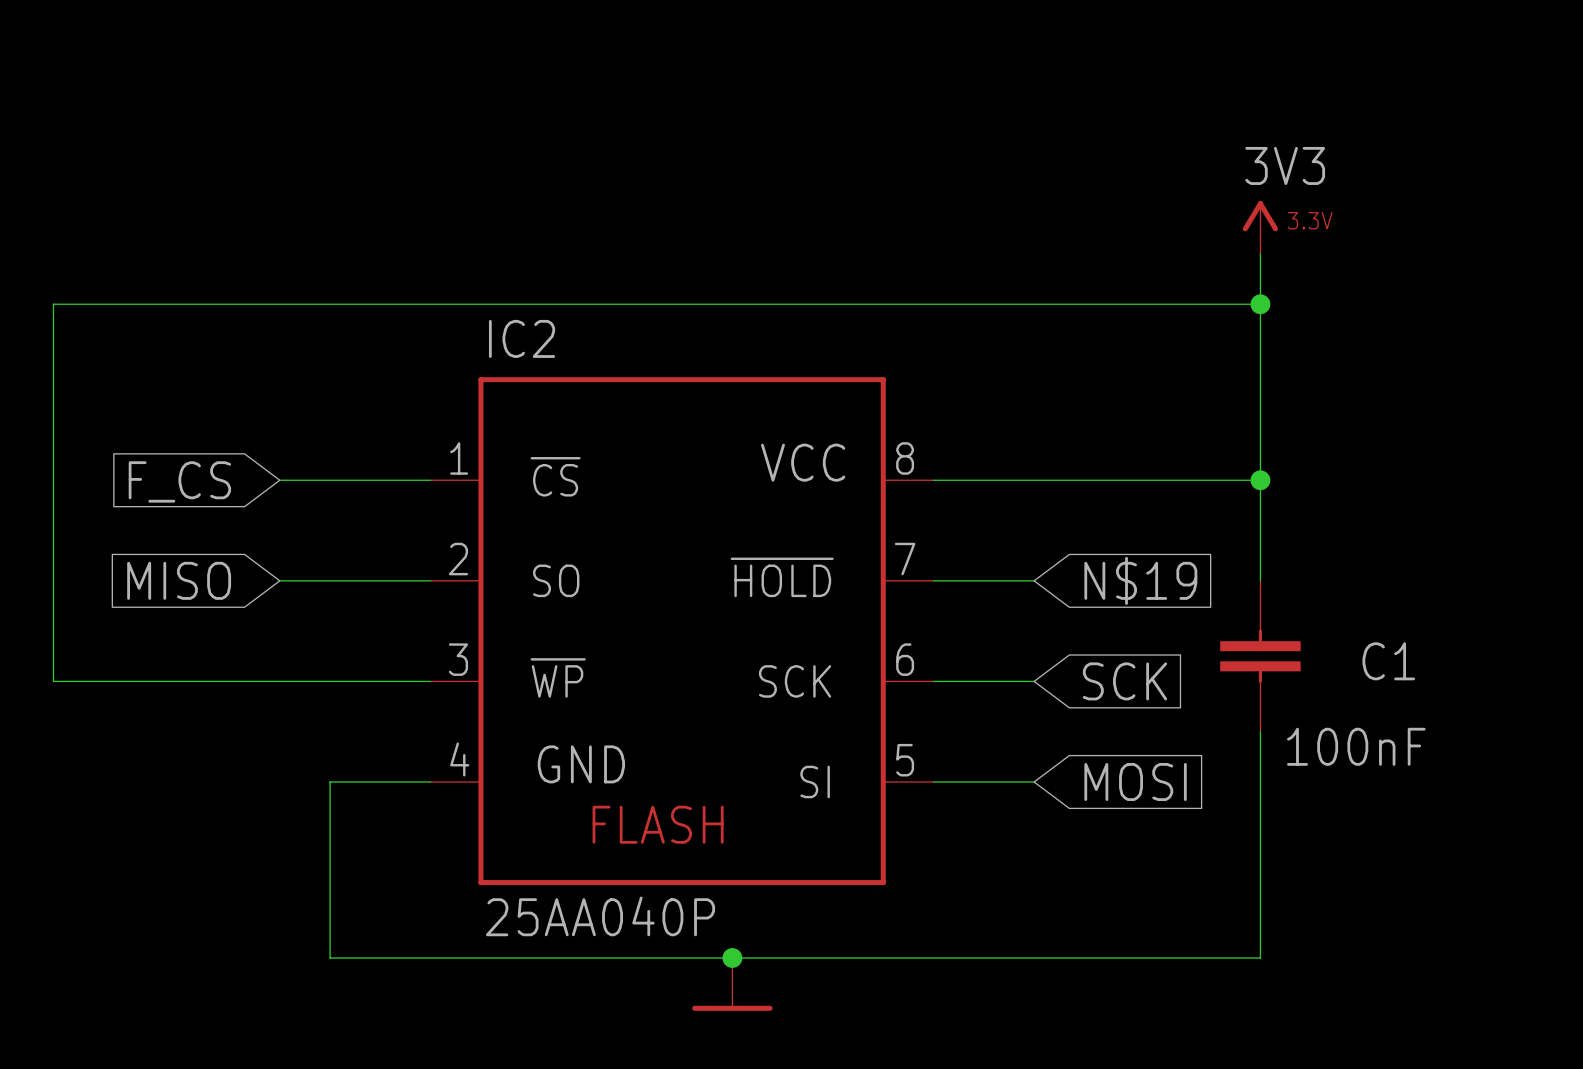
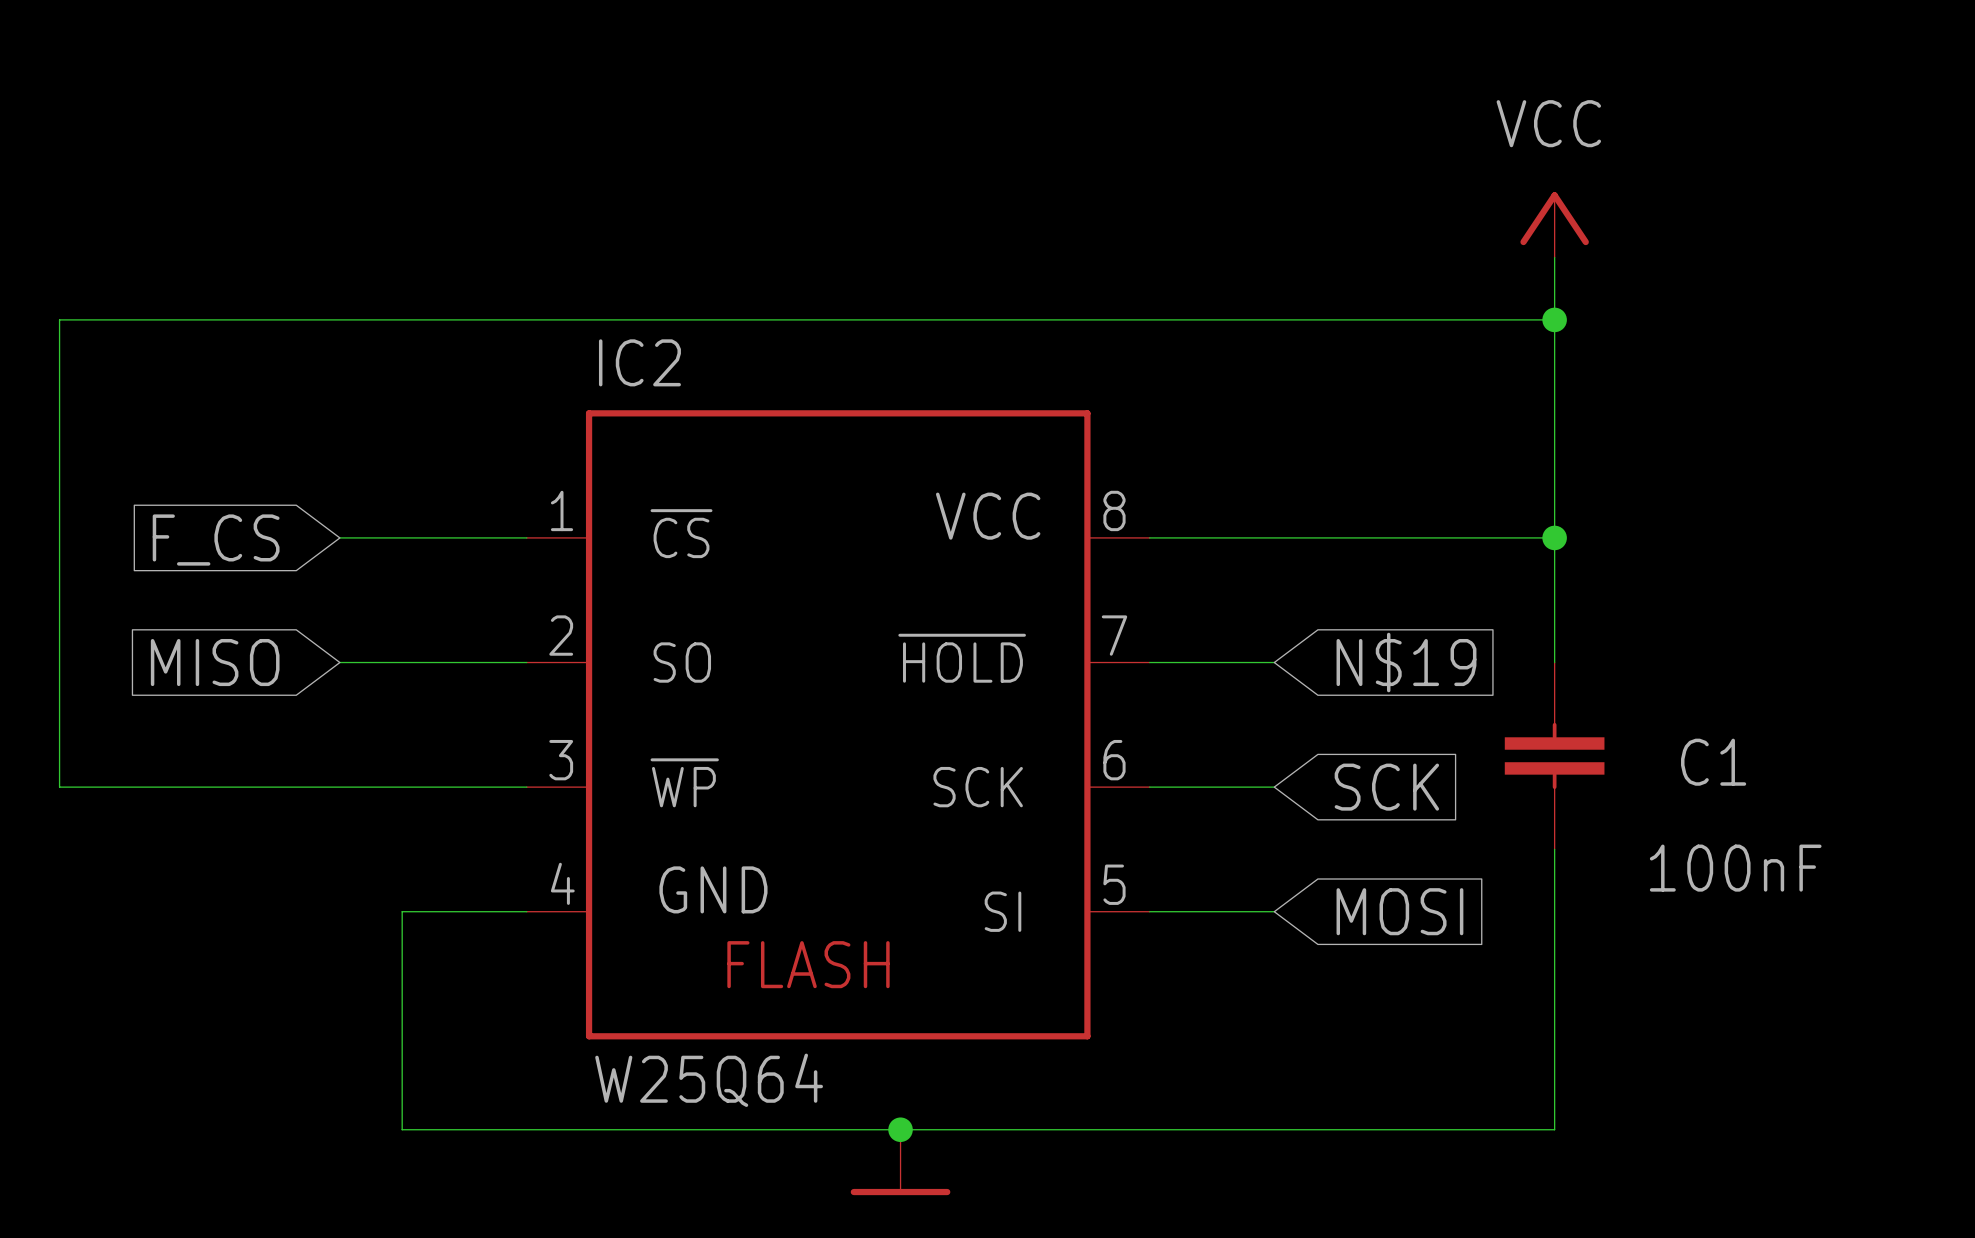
power symbol: 3V3 (1260, 227) -> VCC (1554, 224)
C1 value position: 100nF (1356, 746) -> 100nF (1735, 868)
IC2 value: 25AA040P (600, 916) -> W25Q64 (709, 1080)

